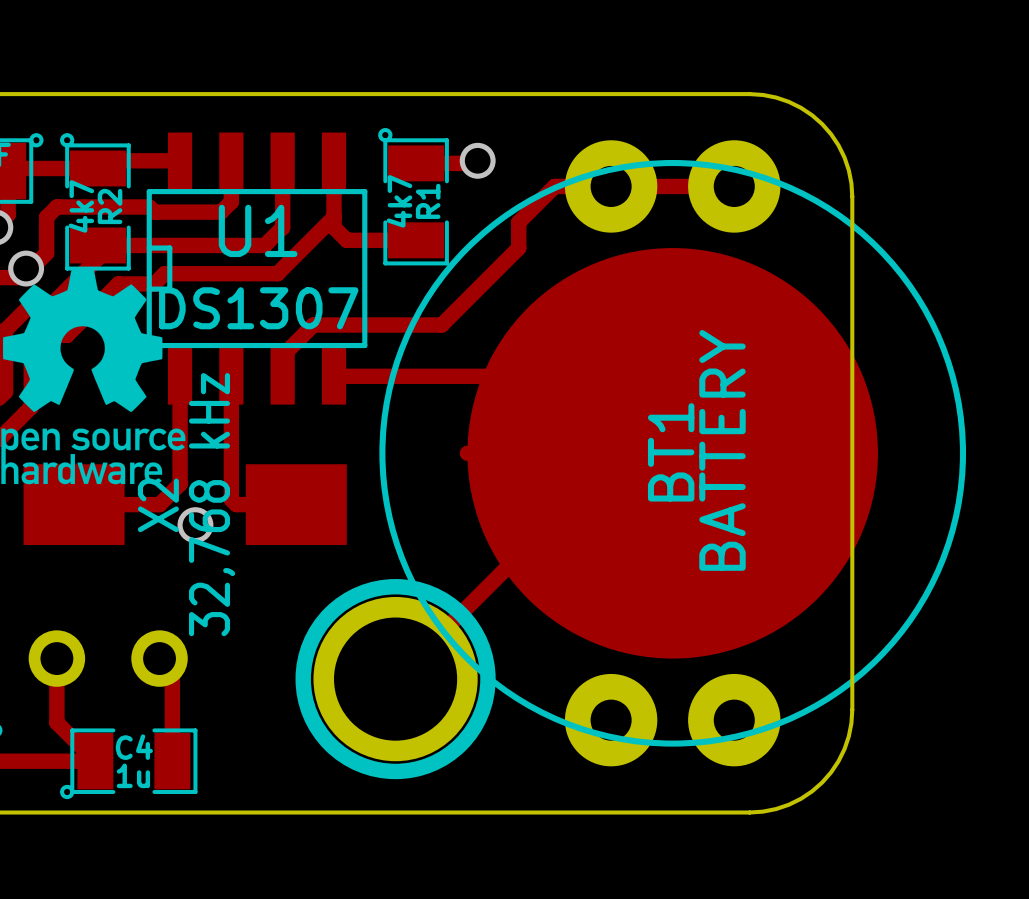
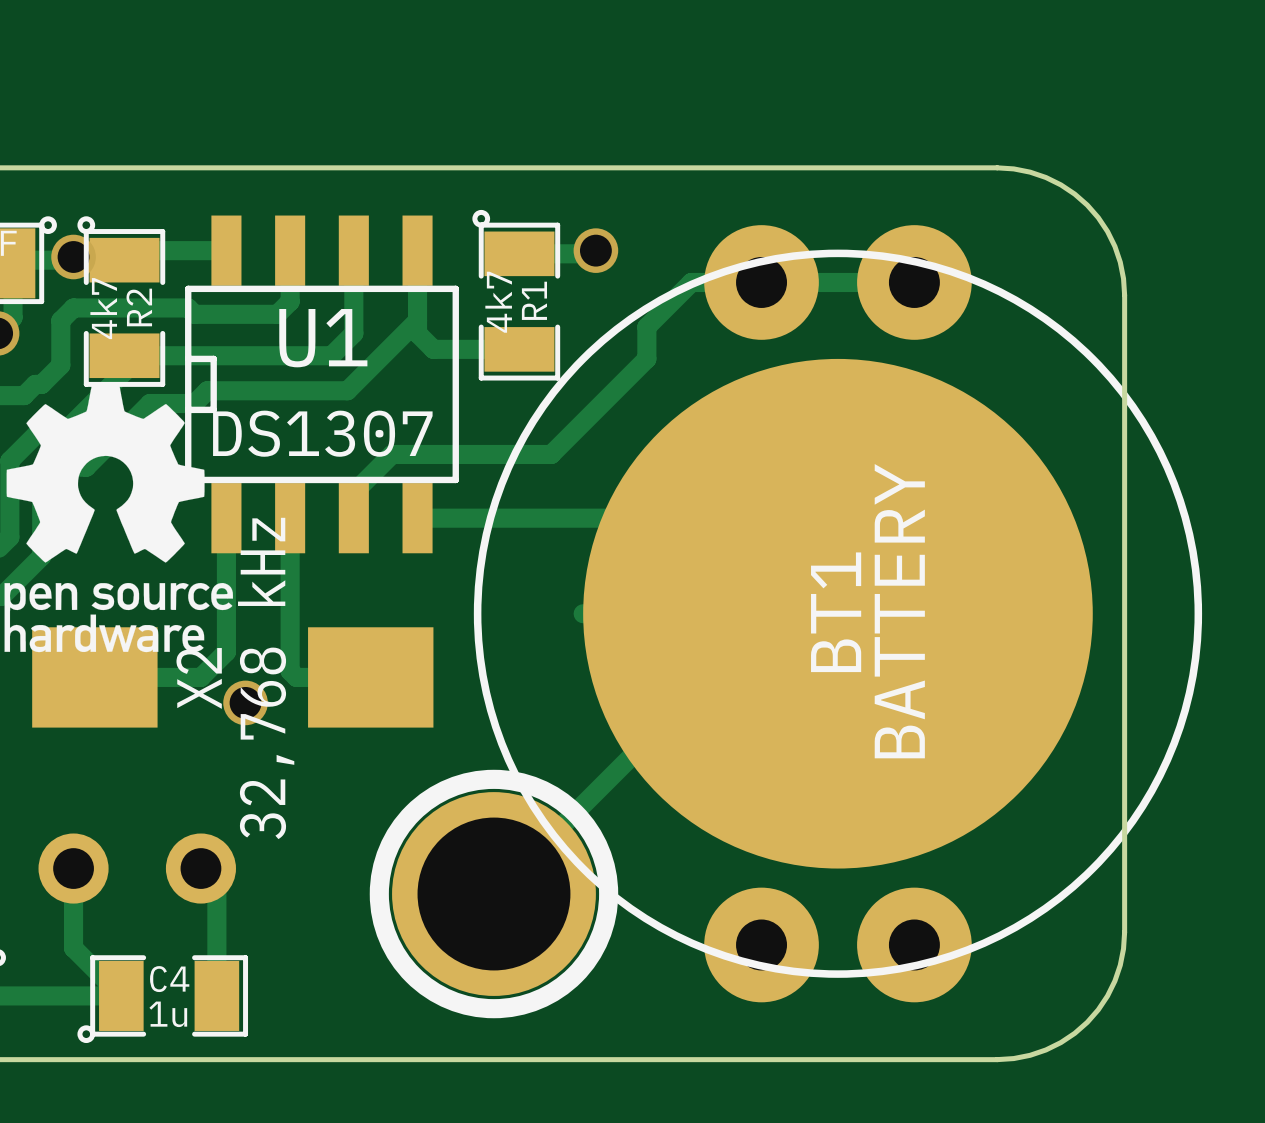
board edge: (749, 94) (763, 94) (788, 101) (800, 107) (822, 124) (831, 134) (844, 157) (848, 170) (852, 196) (851, 723) (844, 749) (838, 761) (822, 782) (800, 798) (788, 804) (776, 809) (749, 812) -> (933, 167) (1013, 168) (1030, 172) (1060, 184) (1087, 205) (1107, 231) (1120, 262) (1124, 295) (1124, 932) (1120, 965) (1114, 980) (1098, 1009) (1087, 1022) (1060, 1042) (1030, 1055) (1013, 1058) (933, 1059)
via: none -> (73, 257)
via: (26, 268) -> none

